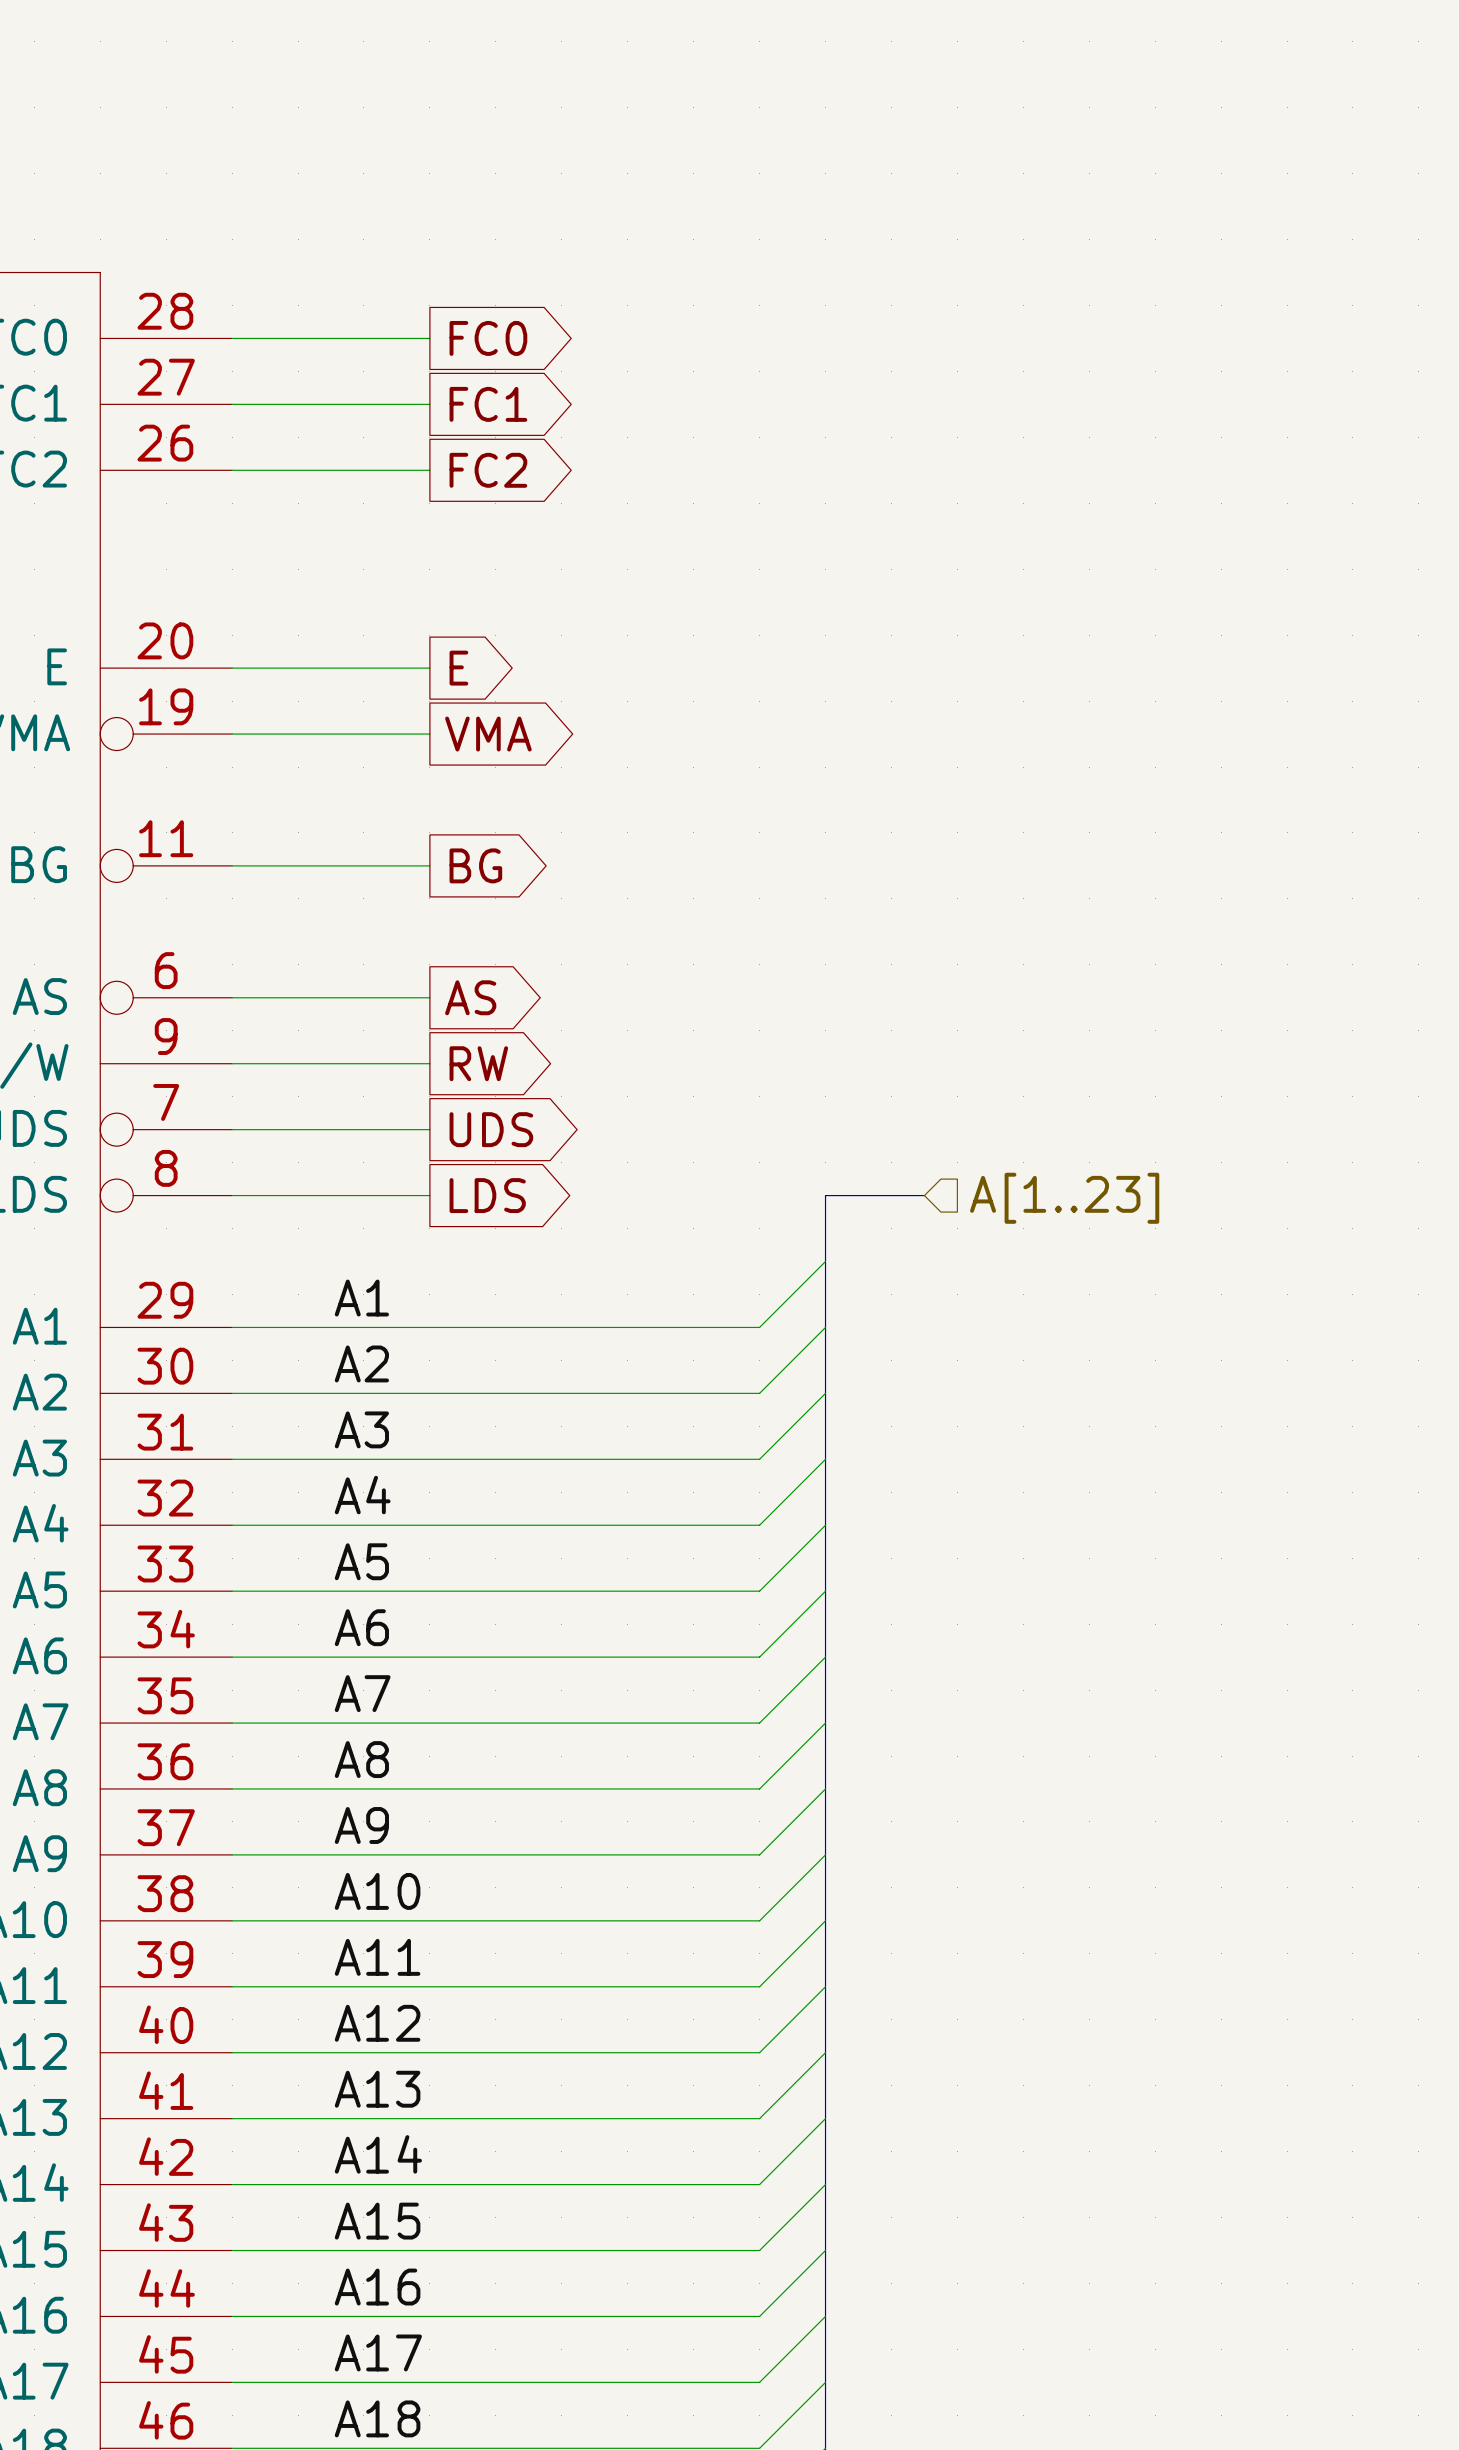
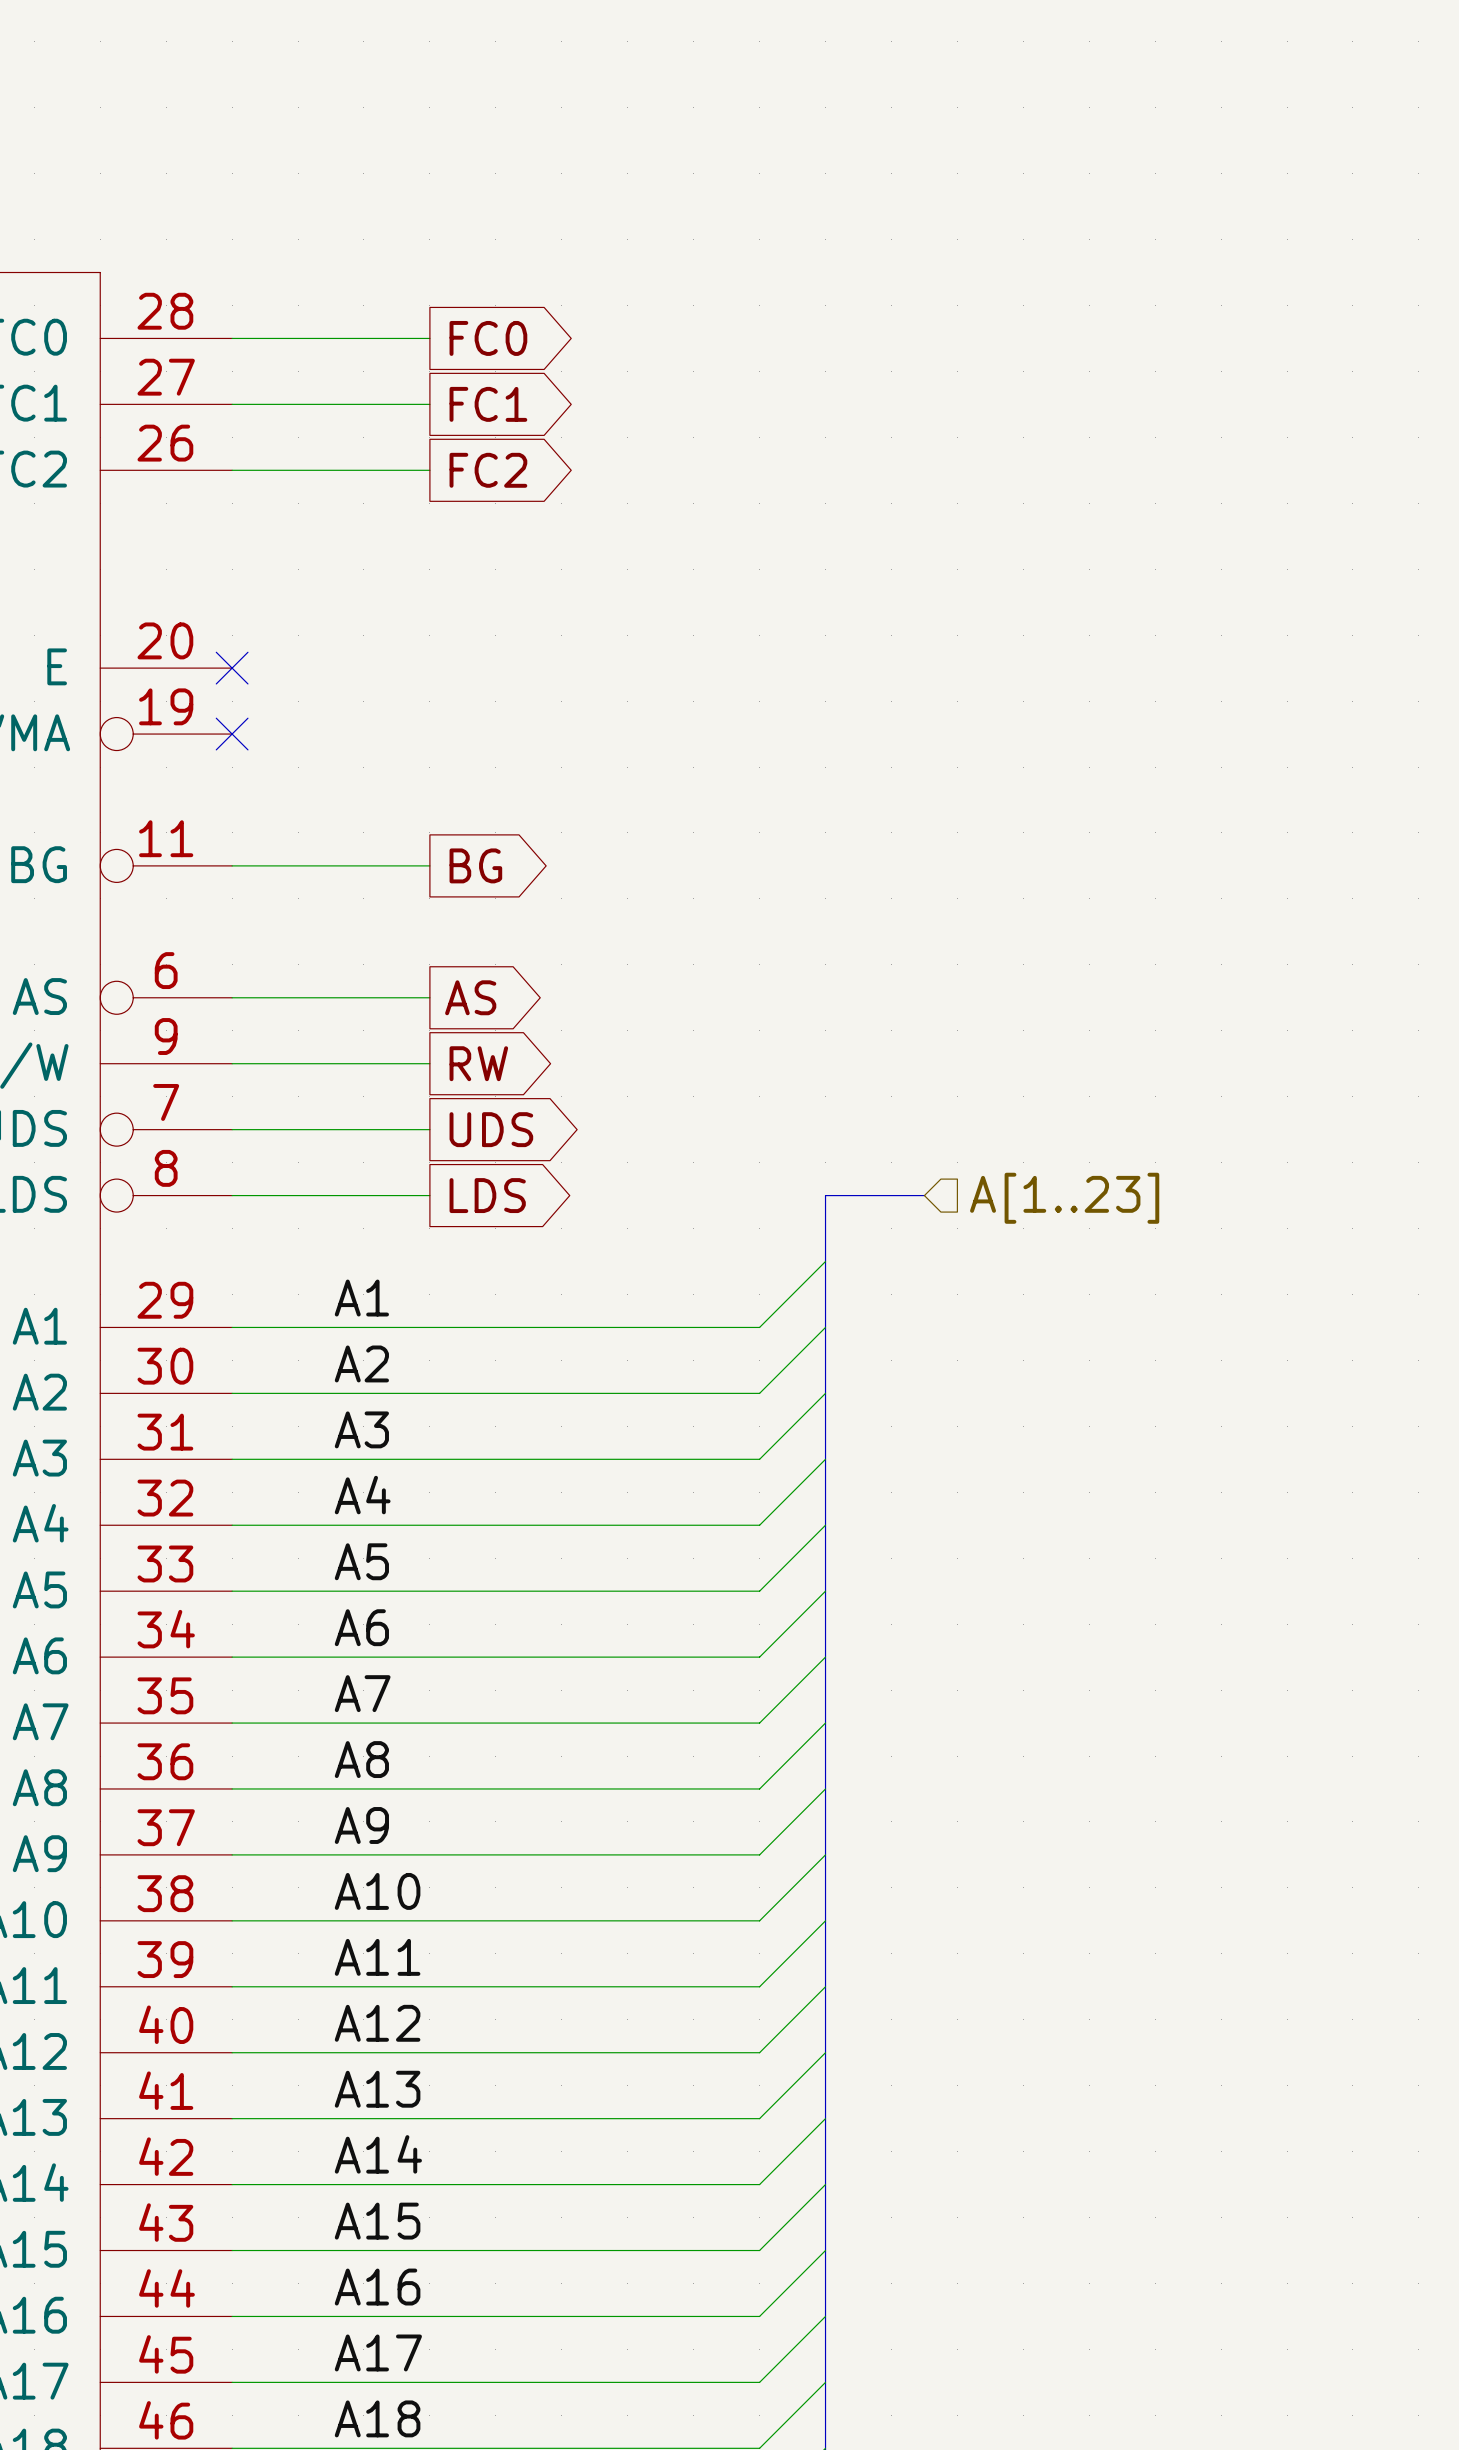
wire: (232, 668) (429, 668) -> none
no-connect mark: none -> (232, 668)
global label: E (458, 668) -> none
wire: (232, 734) (429, 734) -> none
no-connect mark: none -> (232, 734)
global label: VMA (488, 734) -> none

